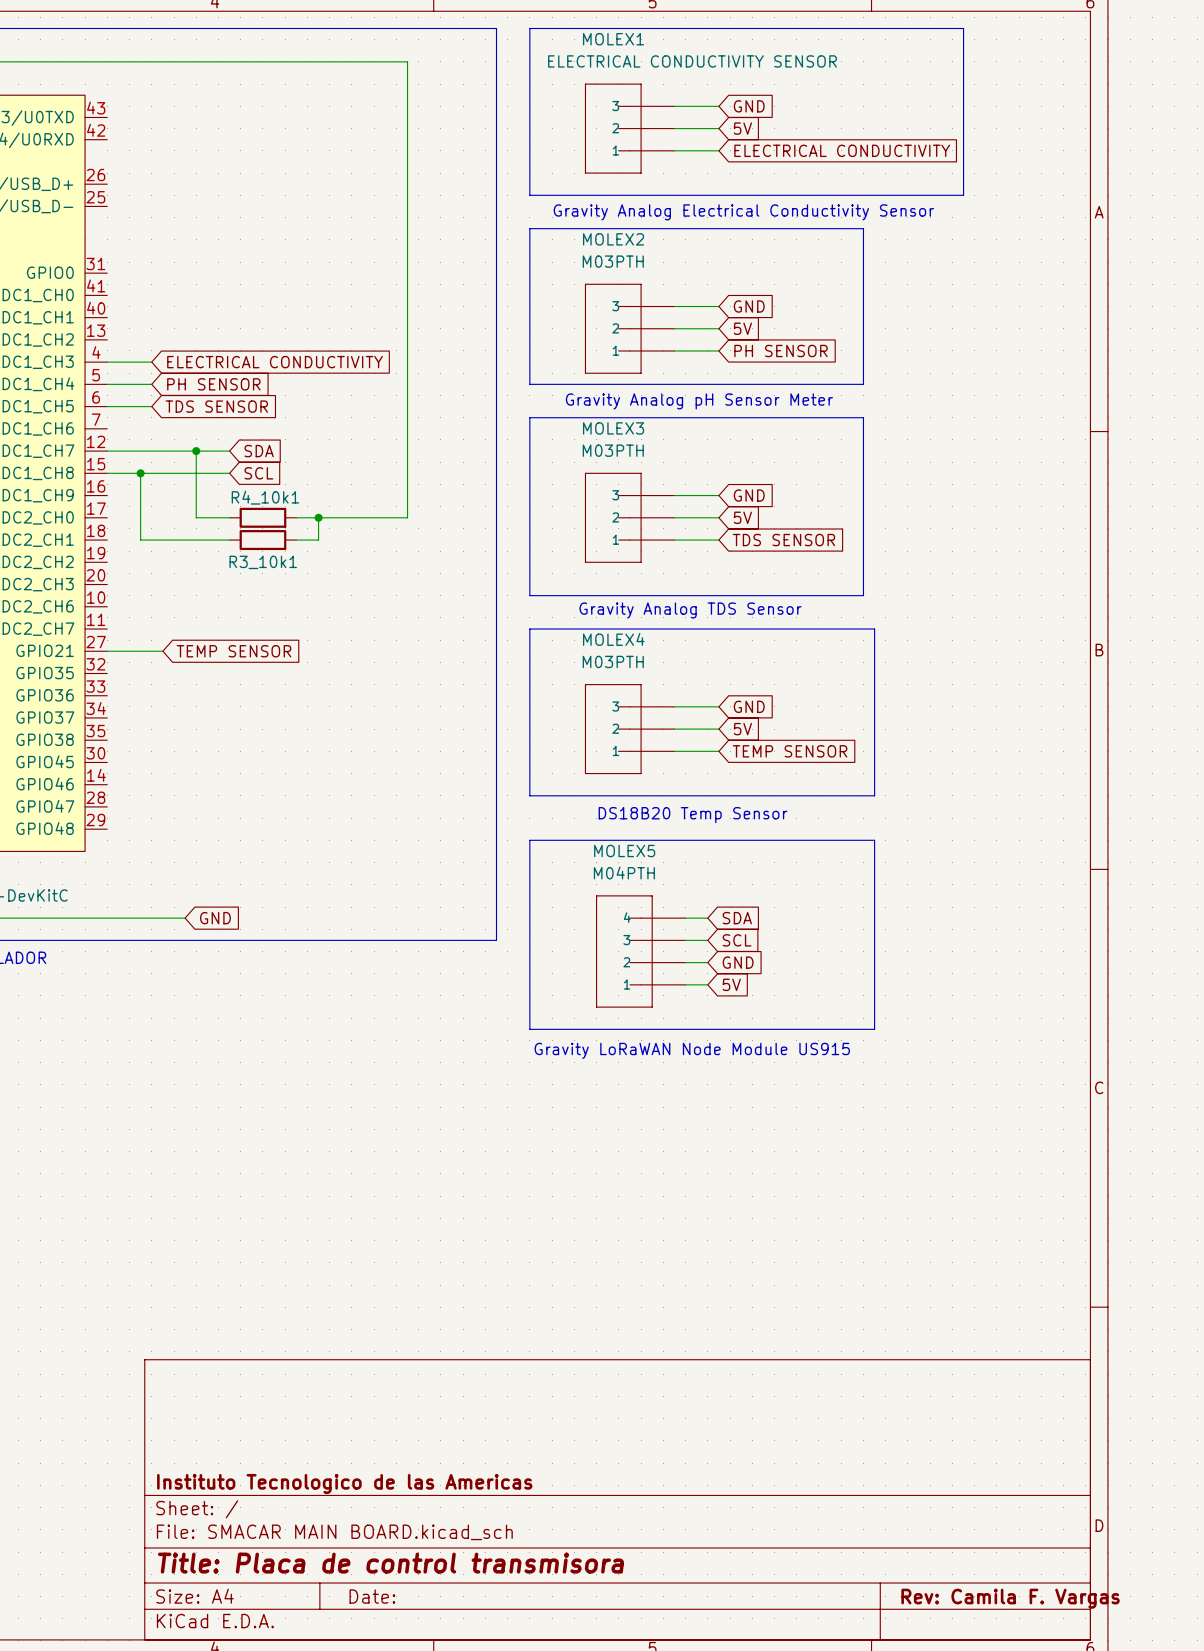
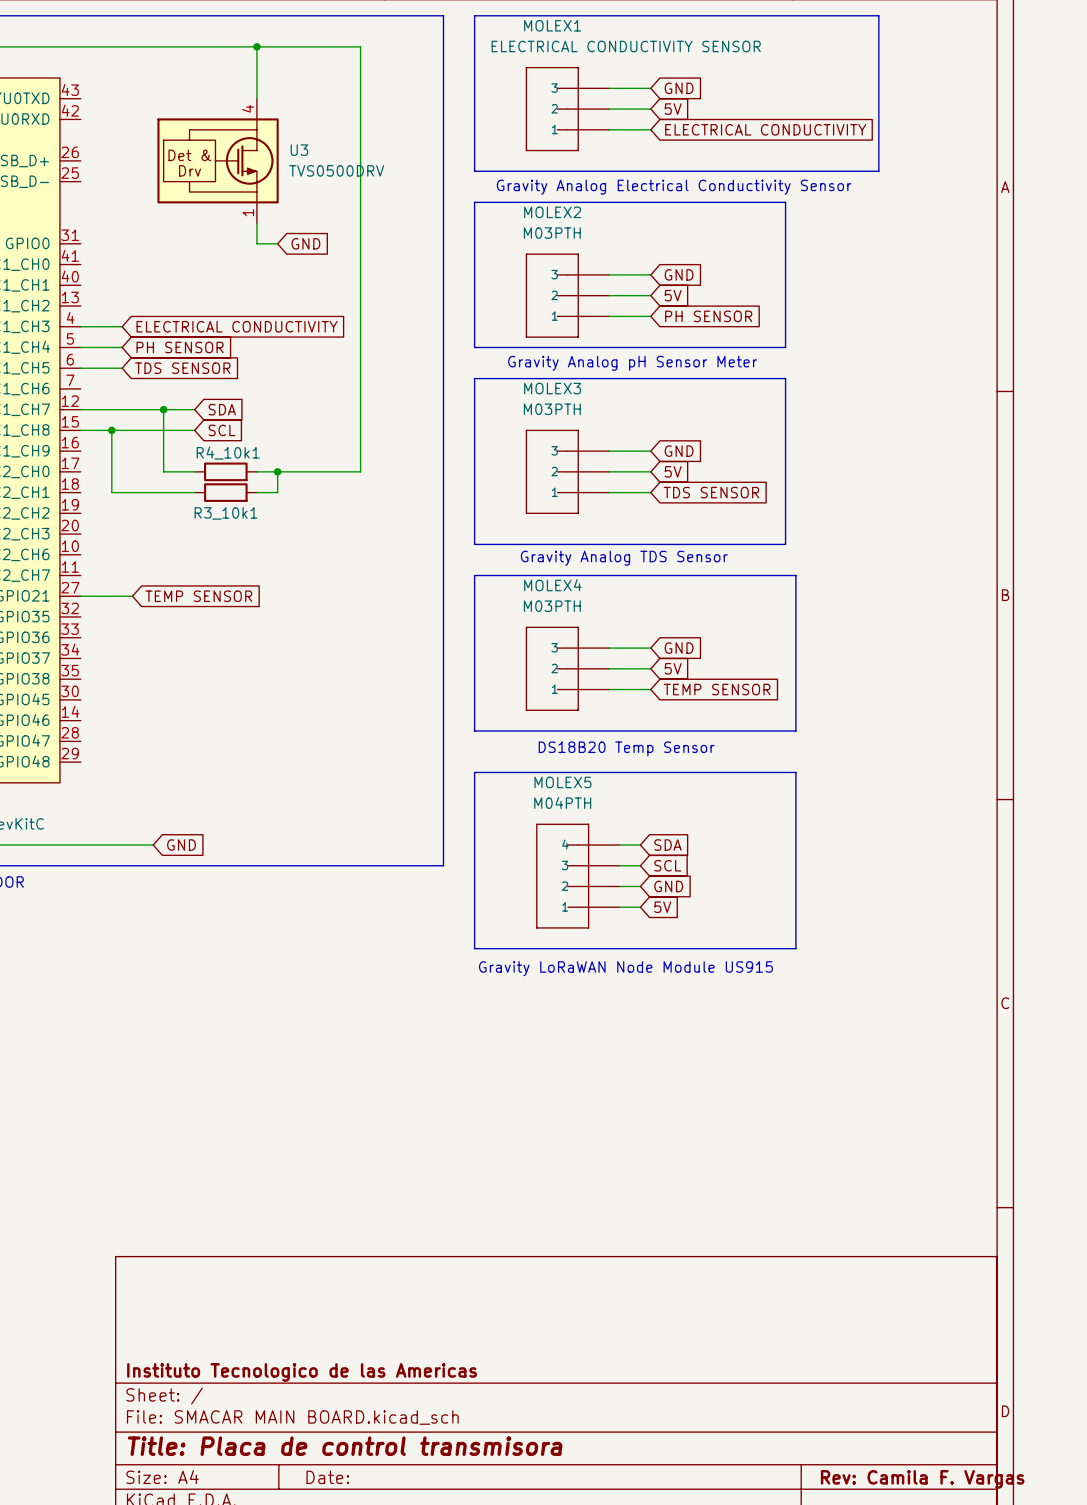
wire: none -> (256, 46) (256, 98)
junction: none -> (256, 46)
U3: none -> TVS0500DRV (218, 160)
wire: none -> (256, 223) (256, 243) (277, 243)
global label: none -> GND (305, 243)

